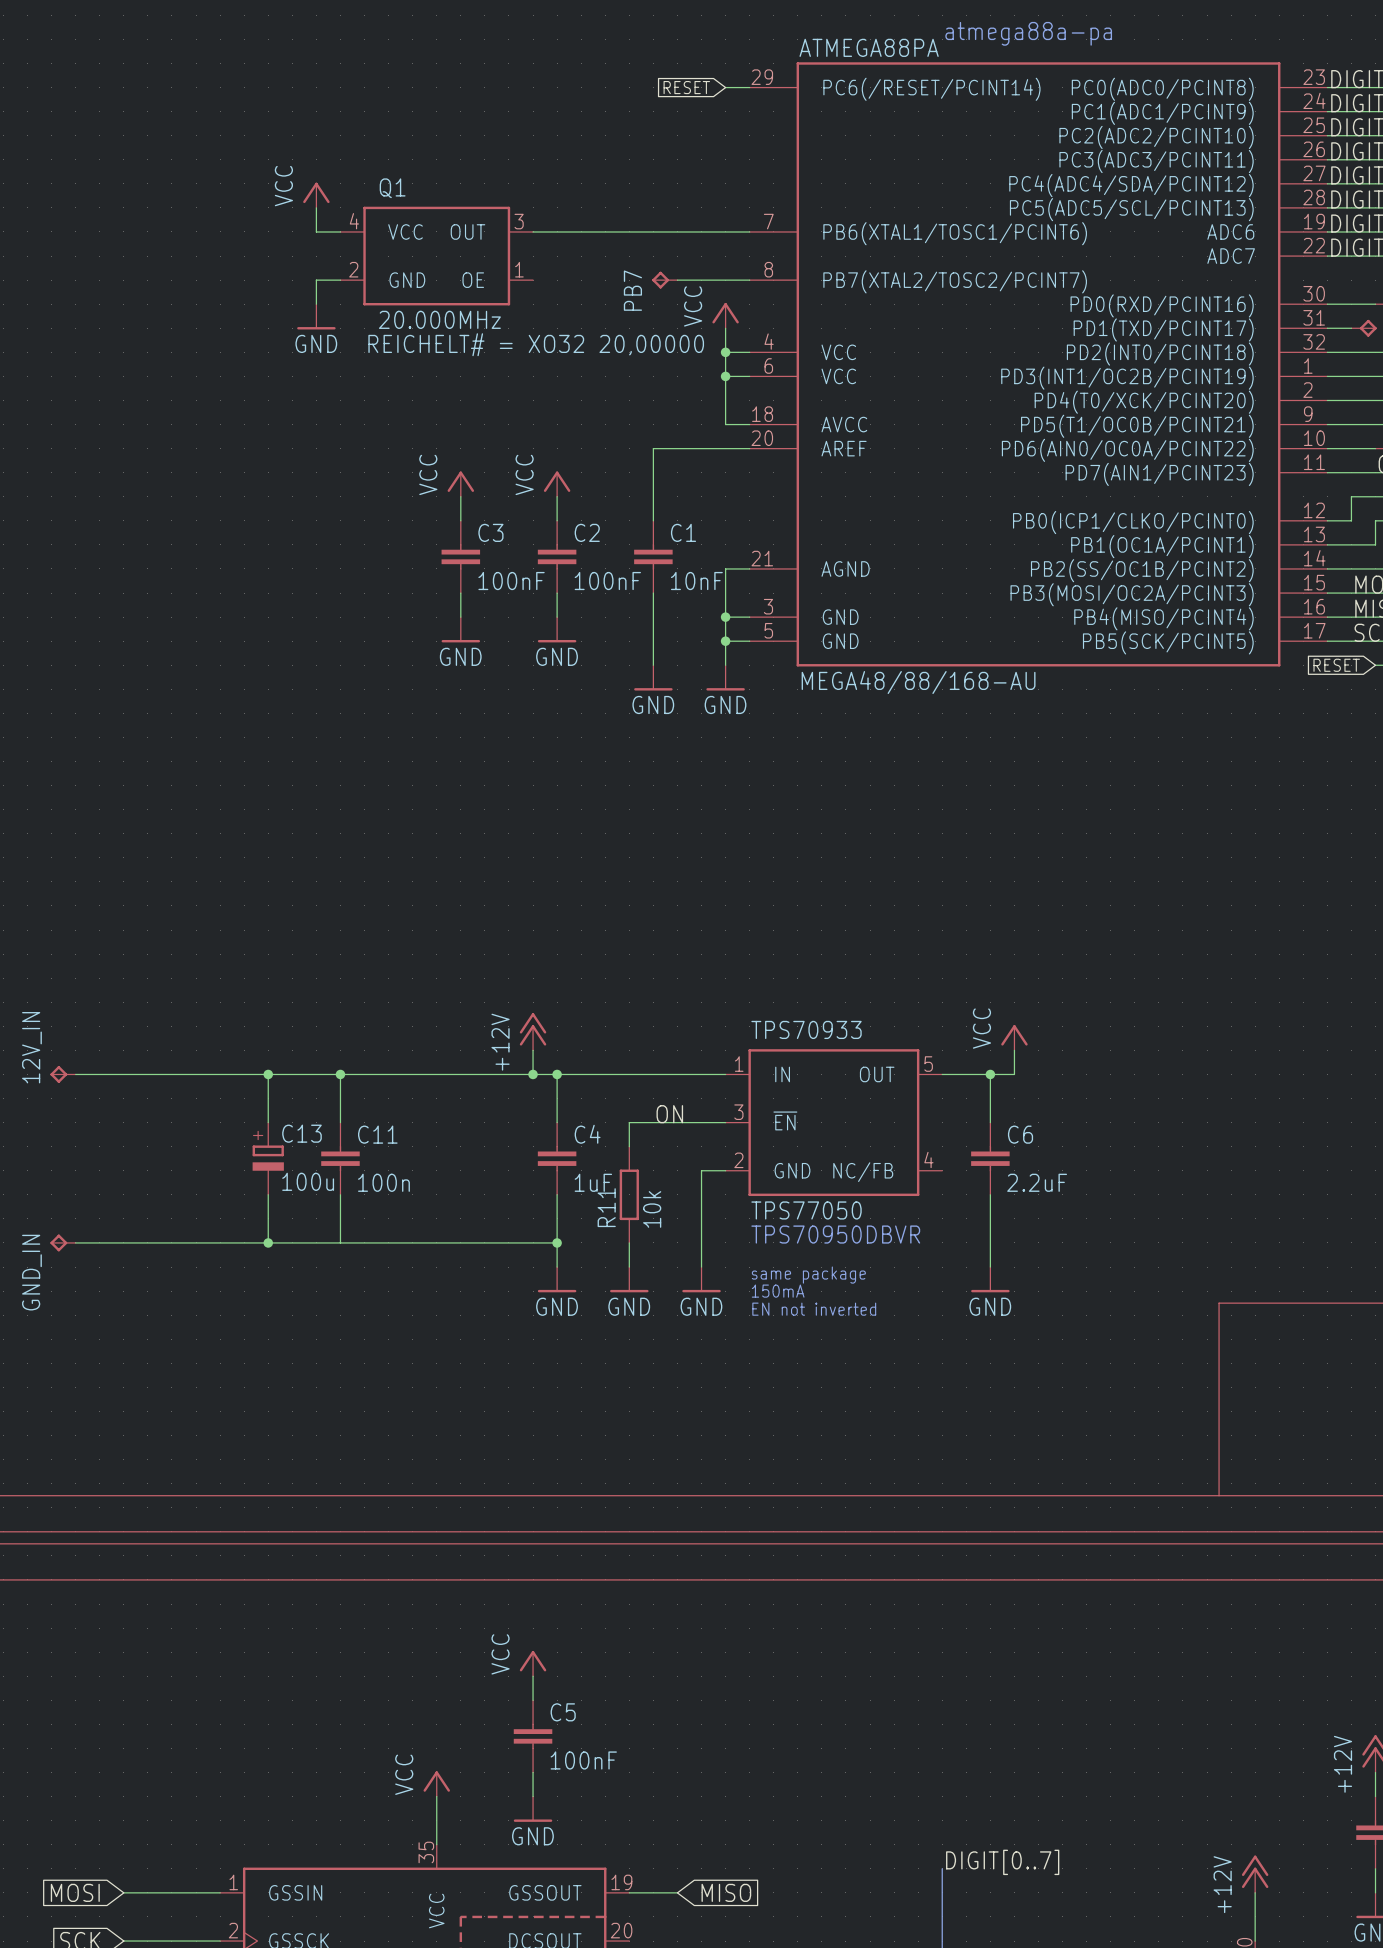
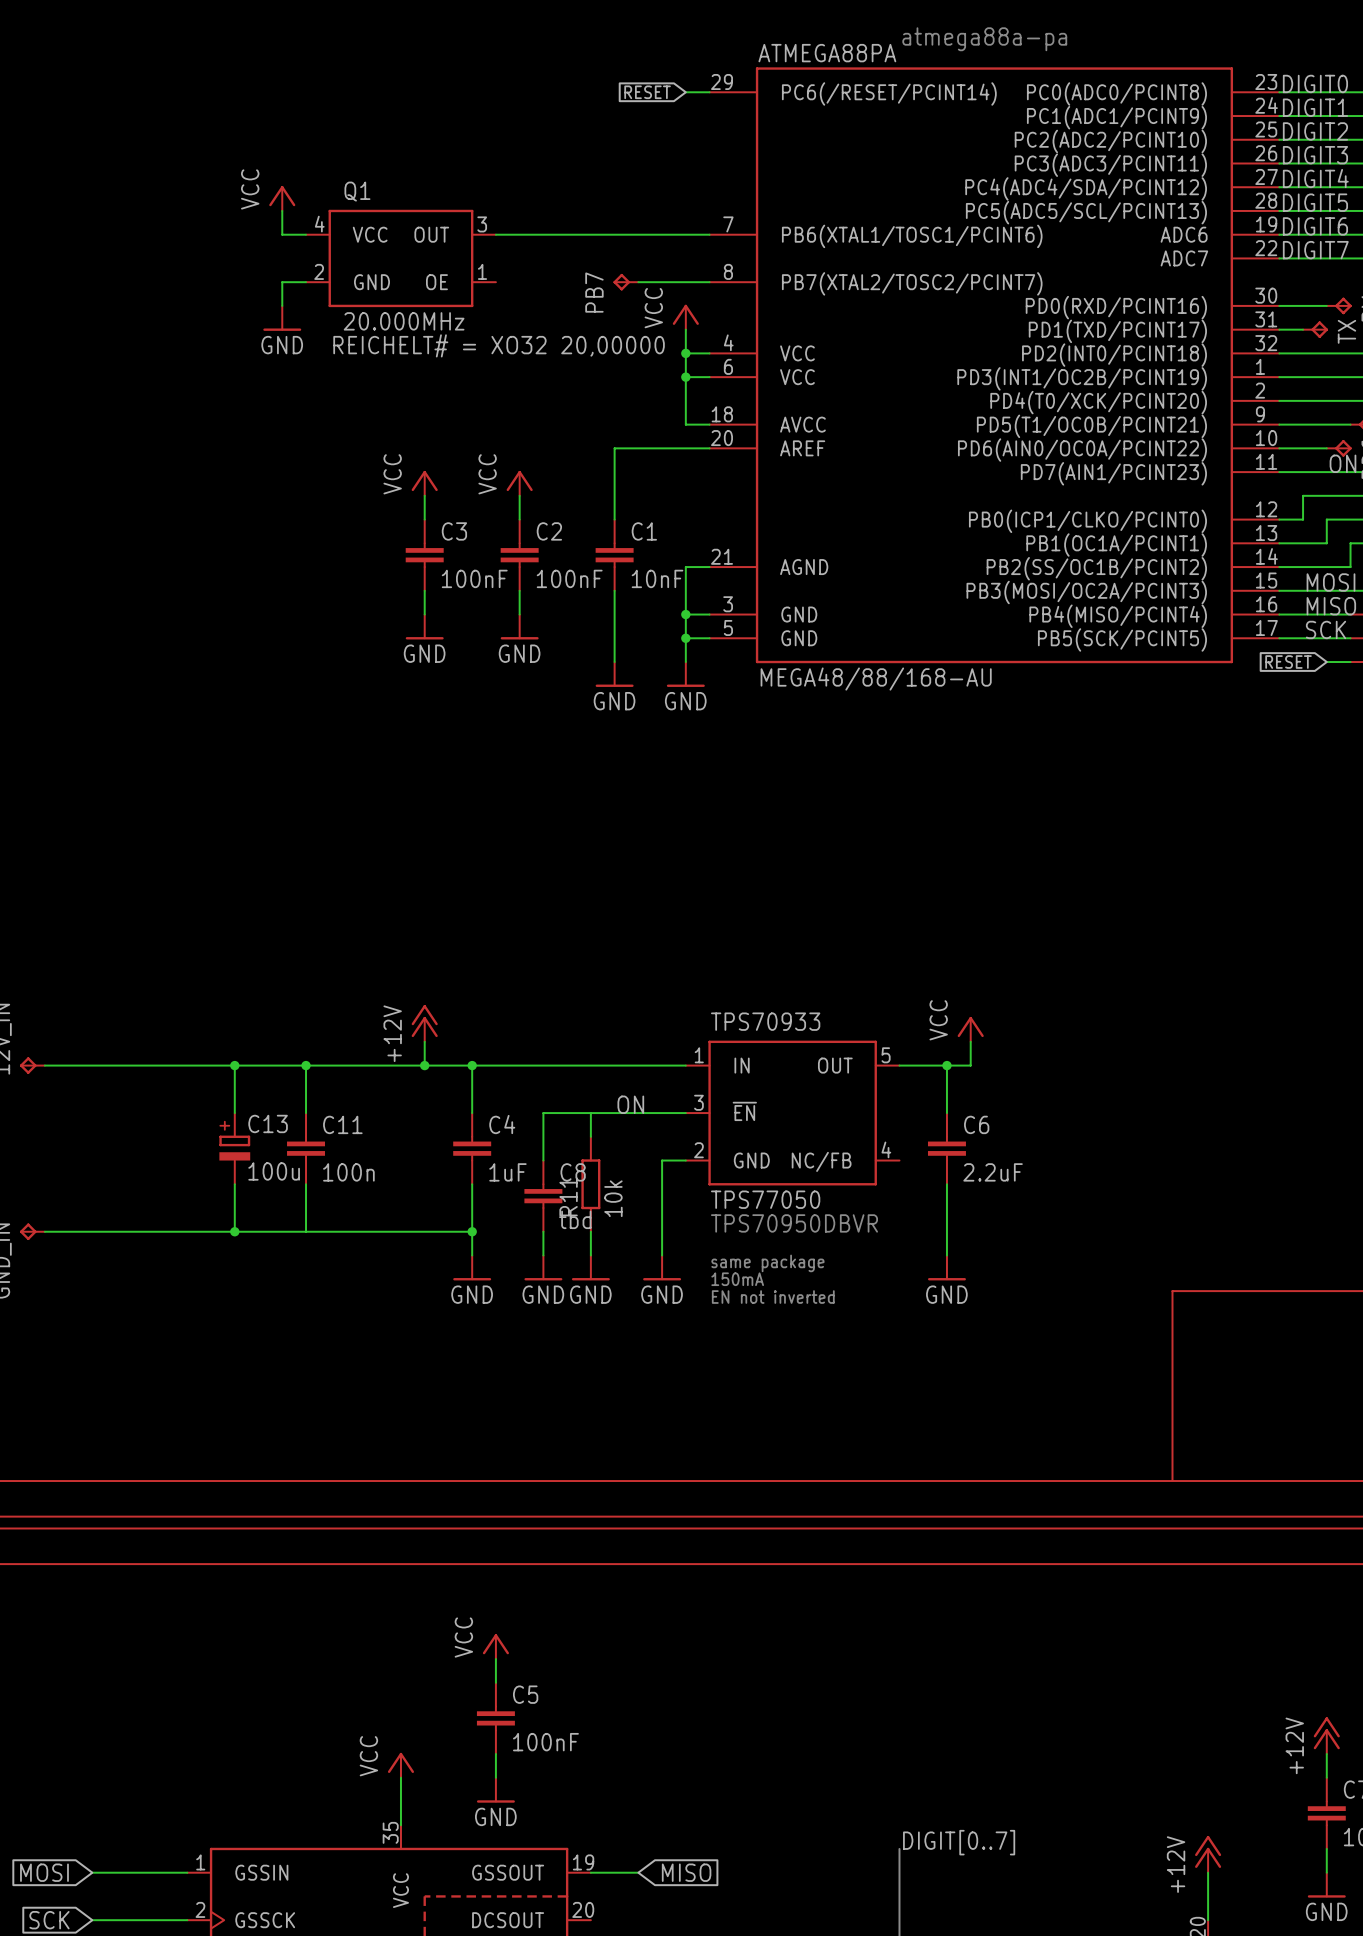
power symbol position: +12V (533, 1031) -> +12V (424, 1023)
wire: (533, 1050) (533, 1074) -> (424, 1041) (424, 1065)
junction: none -> (424, 1065)
junction: none -> (472, 1065)
junction: (533, 1074) -> none
wire: (557, 1074) (557, 1122) -> (472, 1065) (472, 1113)
junction: (557, 1074) -> none
wire: none -> (590, 1113) (543, 1113) (543, 1160)
C4 position: (557, 1158) -> (472, 1148)
wire: (557, 1194) (557, 1267) -> (472, 1184) (472, 1255)
C8: none -> tbd (543, 1196)
wire: (508, 1242) (557, 1242) -> none
junction position: (557, 1242) -> (472, 1231)
wire: none -> (543, 1231) (543, 1255)
power symbol: none -> GND (472, 1267)
power symbol: GND (557, 1279) -> none
power symbol: none -> GND (543, 1267)

